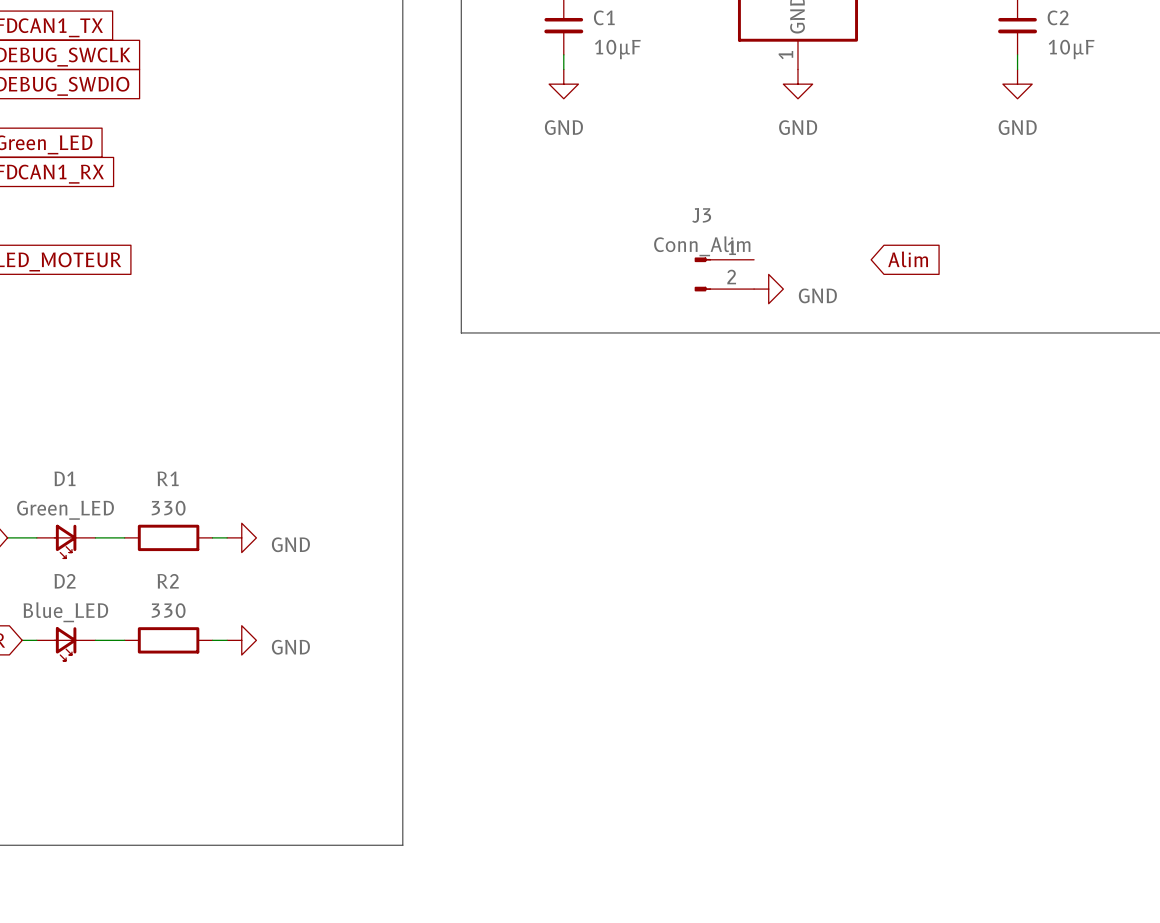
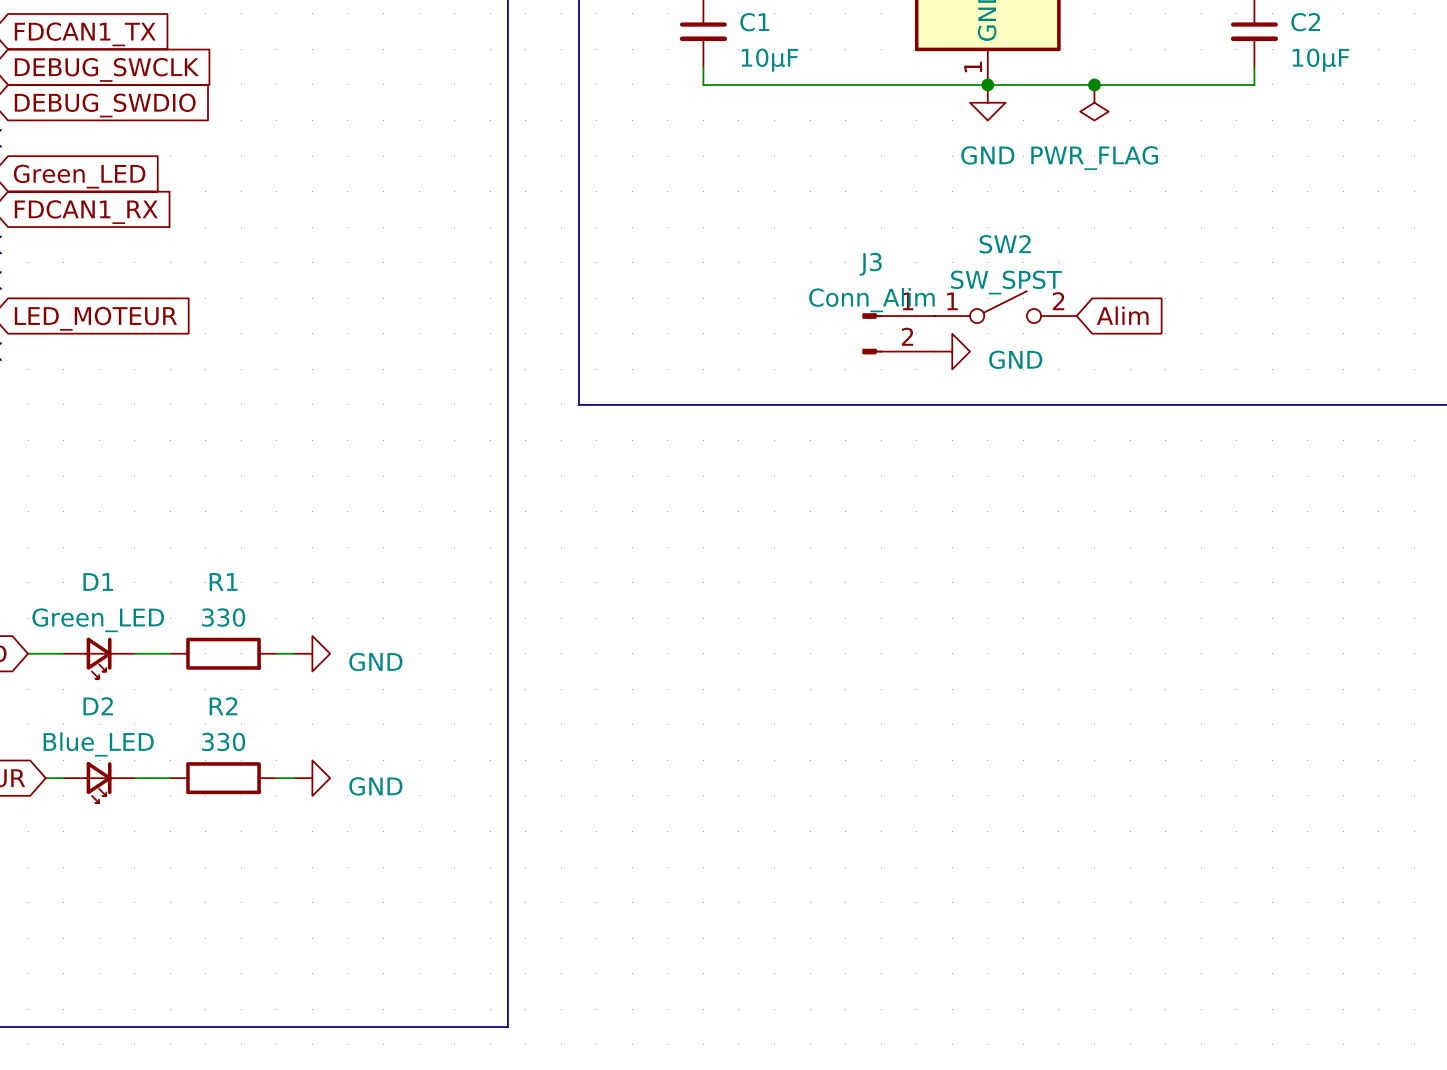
wire: none -> (703, 84) (1254, 84)
junction: none -> (987, 84)
junction: none -> (1094, 84)
power symbol: GND (563, 84) -> none
power symbol: none -> PWR_FLAG (1094, 102)
power symbol: GND (1017, 84) -> none
SW2: none -> SW_SPST (1005, 307)

